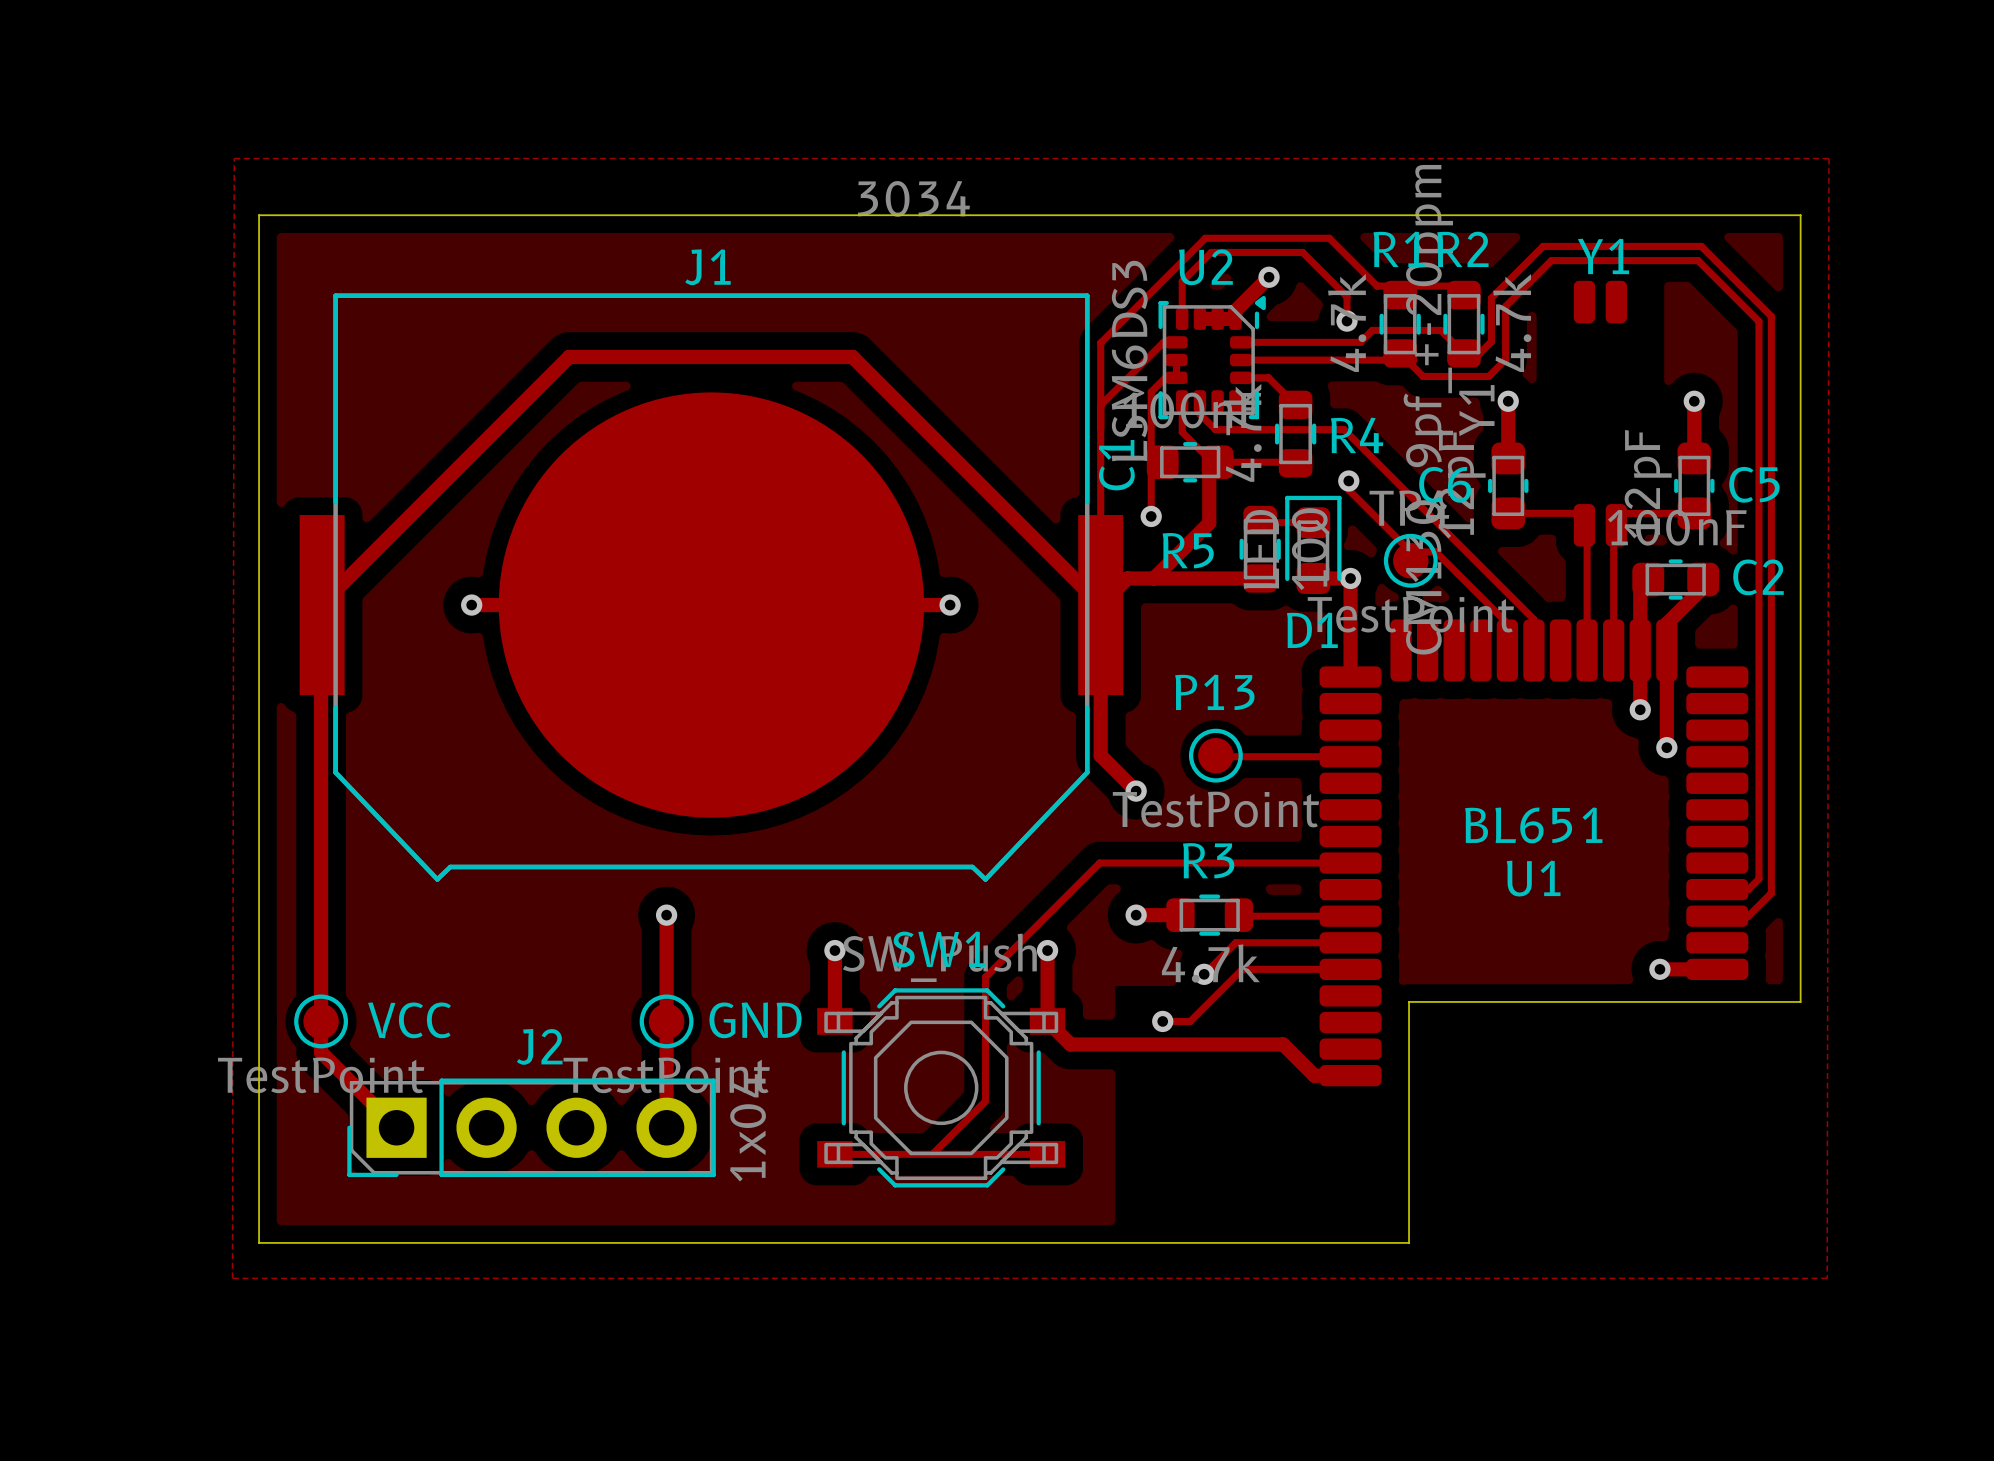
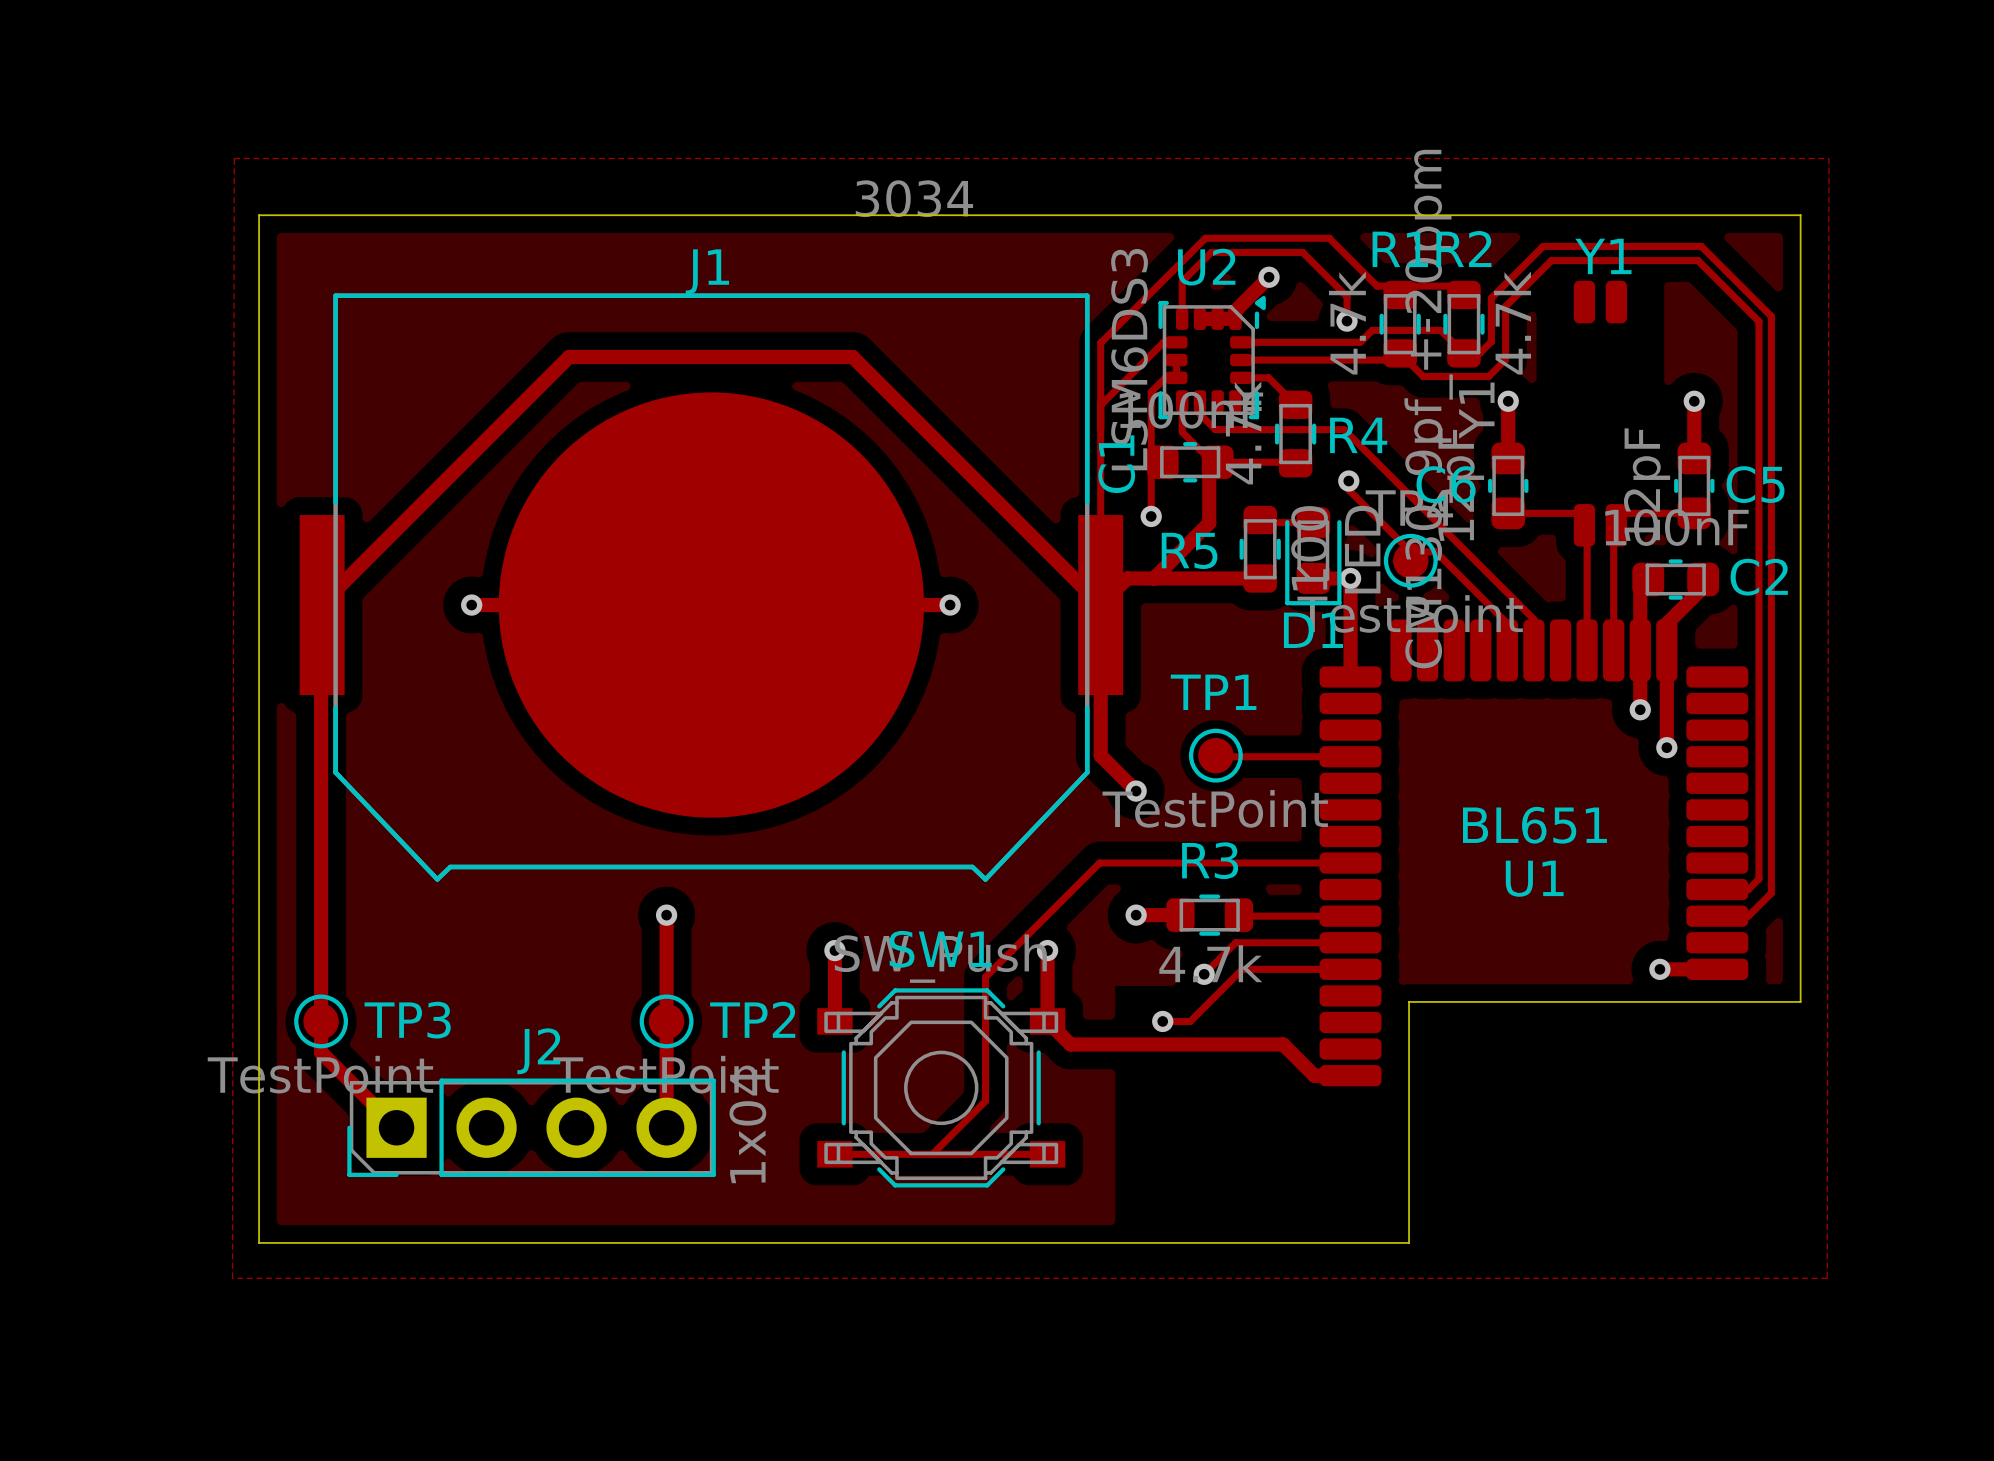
D1 rotation: 0° (1313, 544) -> 180° (1313, 556)
P13 name: P13 (1214, 692) -> TP1 (1213, 692)
VCC name: VCC (409, 1020) -> TP3 (407, 1020)
GND name: GND (755, 1020) -> TP2 (752, 1019)

